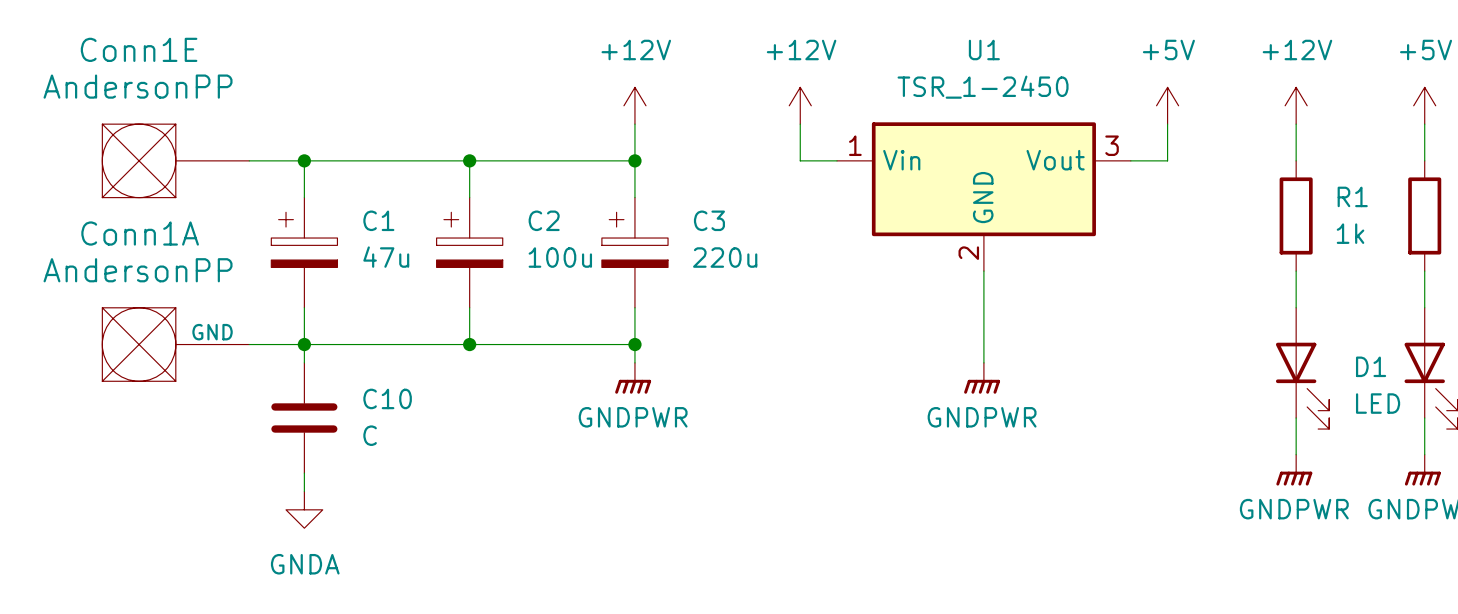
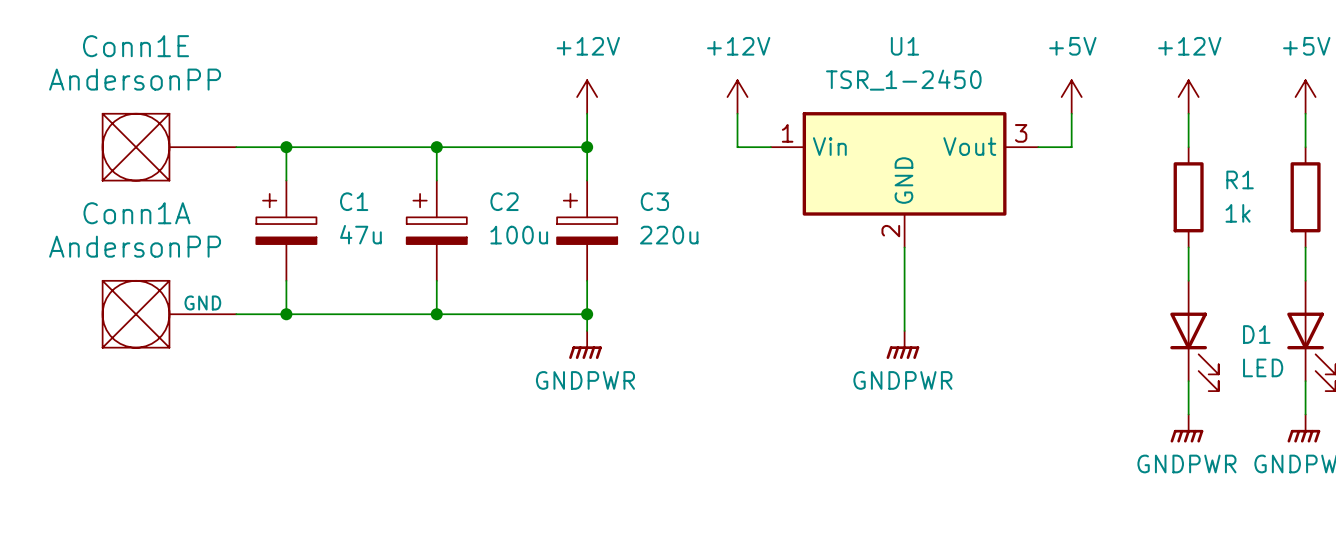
wire: (304, 344) (304, 362) -> none
C10: C (304, 418) -> none
wire: (304, 473) (304, 491) -> none
power symbol: GNDA (304, 509) -> none

